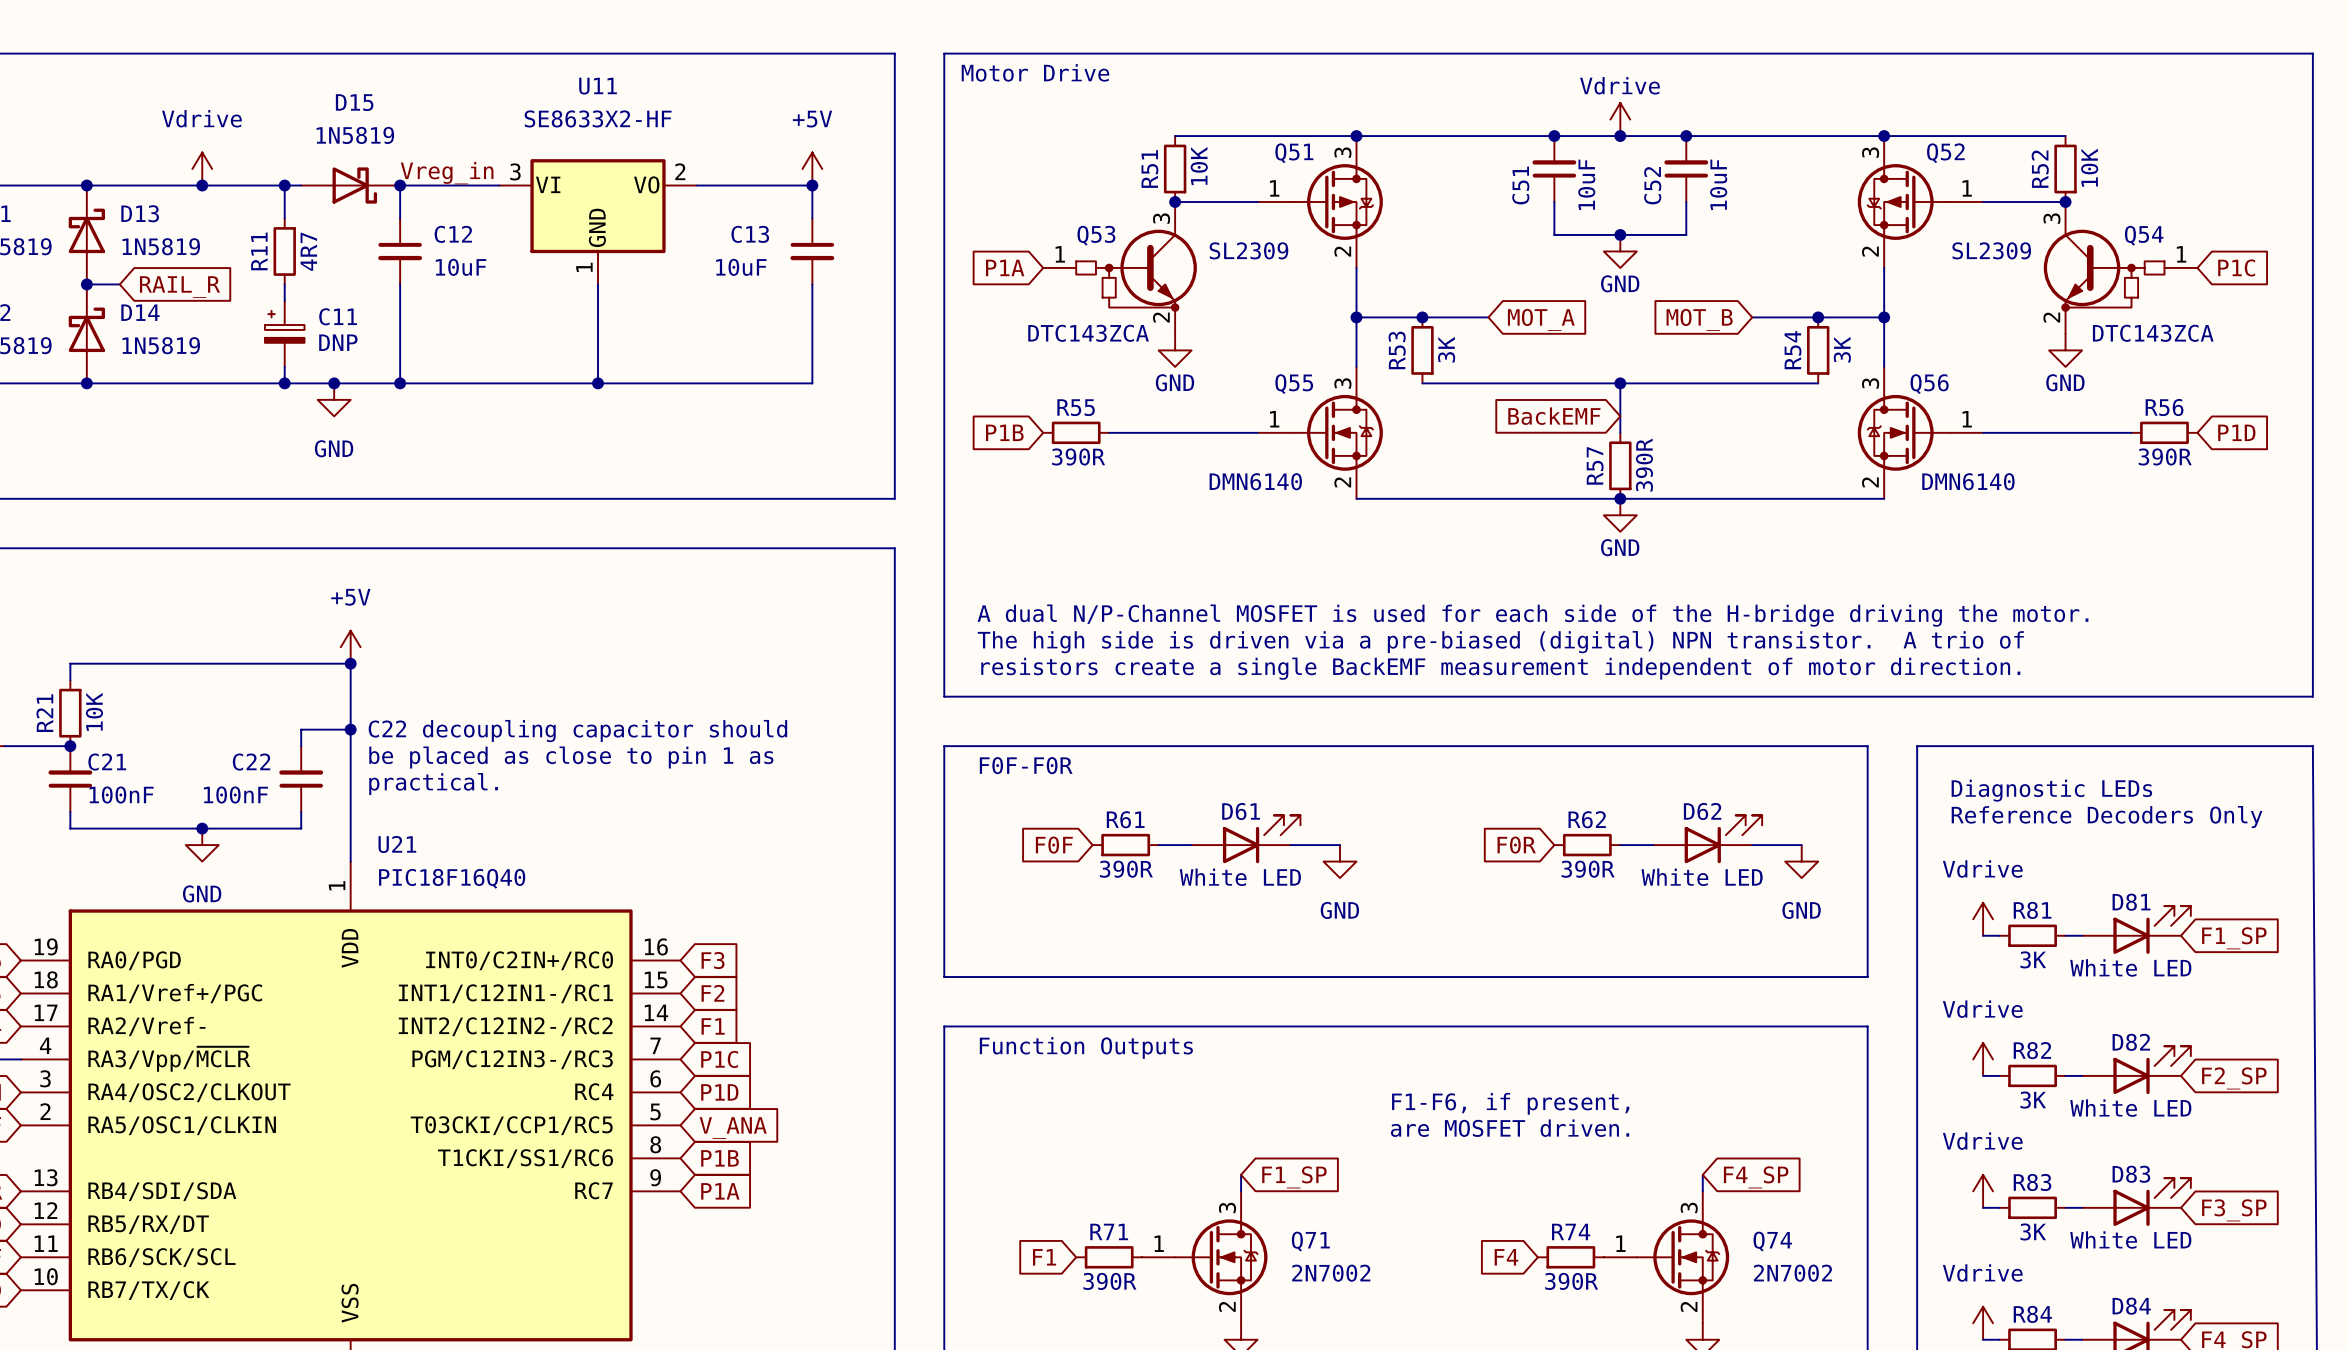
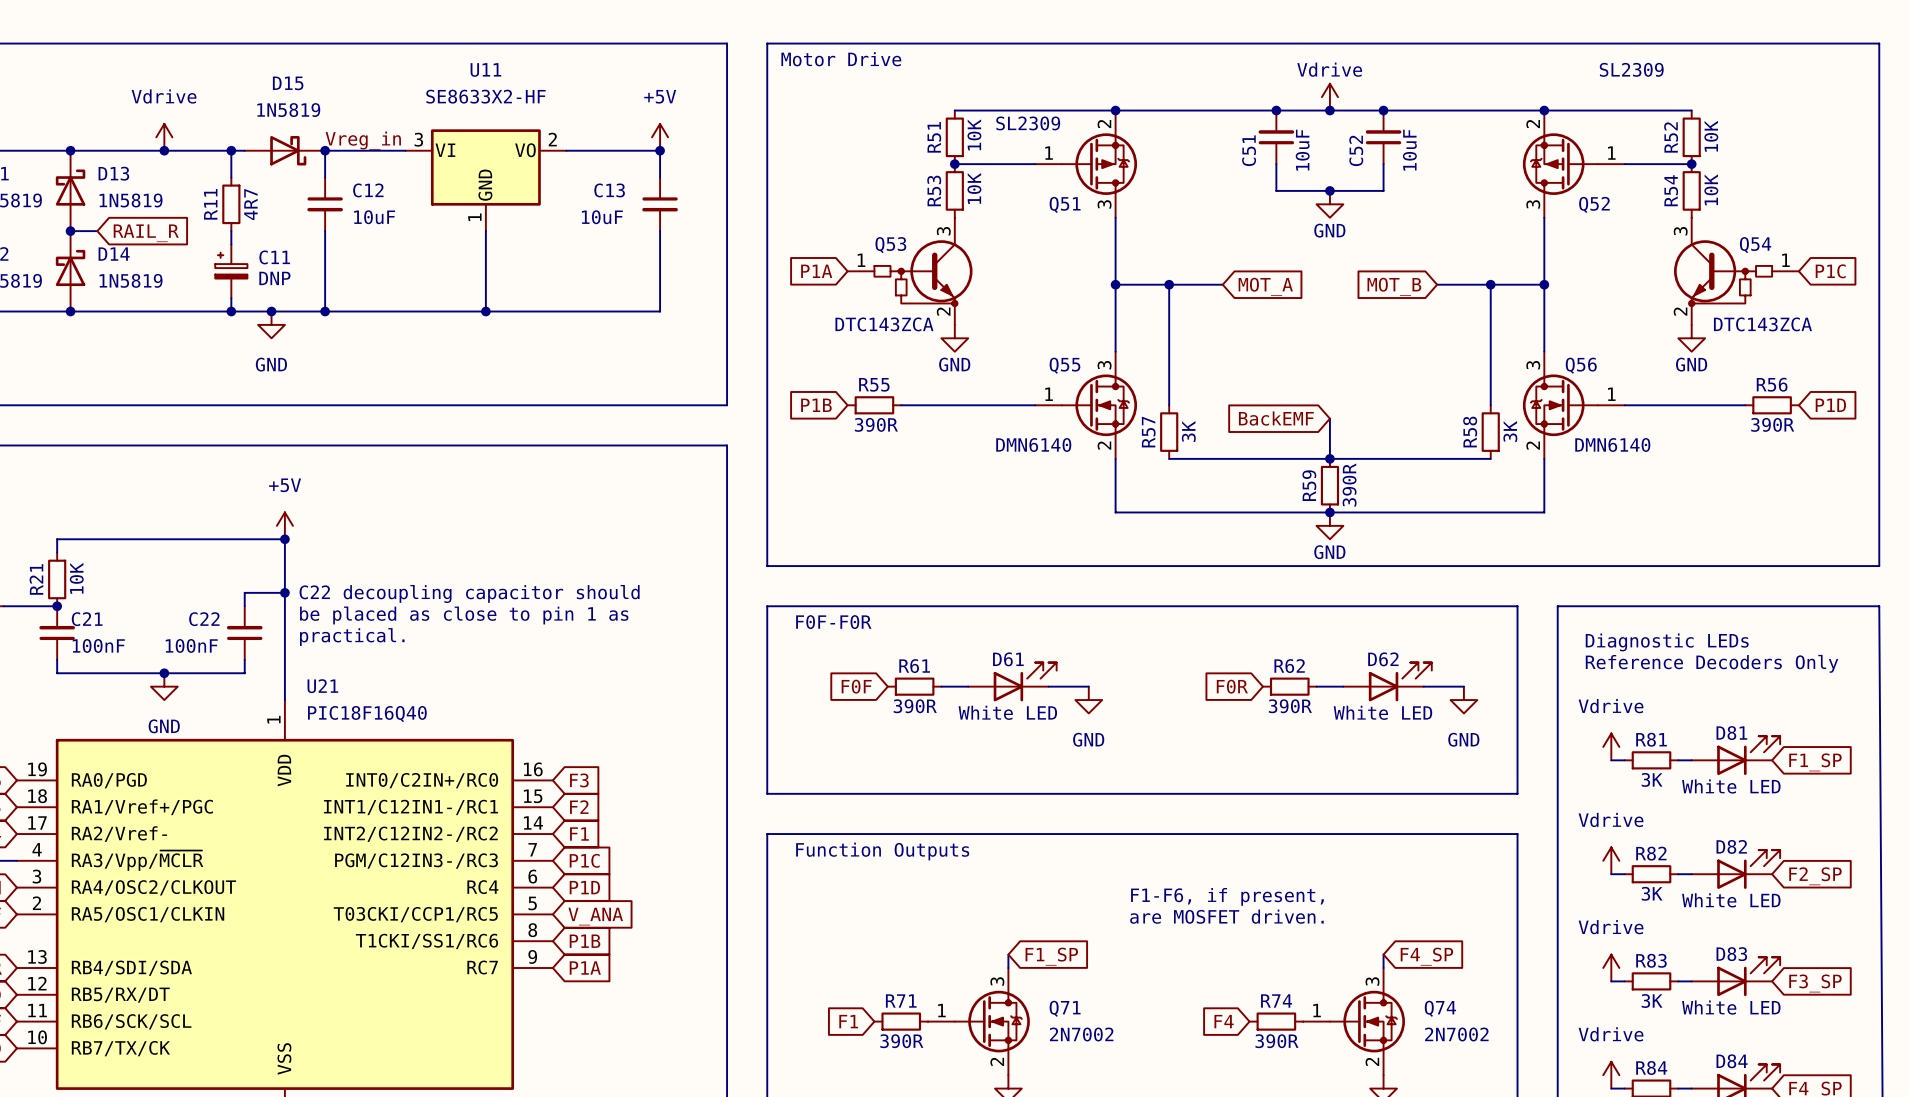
power symbol position: Vdrive (1620, 119) -> Vdrive (1329, 97)
junction position: (1356, 136) -> (1115, 110)
junction position: (1554, 136) -> (1276, 110)
junction position: (1620, 136) -> (1329, 110)
junction position: (1686, 136) -> (1383, 110)
junction position: (1884, 136) -> (1544, 110)
wire: none -> (1678, 110) (1691, 110)
C51 position: (1554, 169) -> (1276, 137)
C52 position: (1686, 169) -> (1383, 137)
R52 position: (2065, 169) -> (1691, 137)
Q51 flip: as is (1336, 202) -> up-down (1099, 164)
wire: (1554, 202) (1554, 234) (1570, 234) -> (1276, 164) (1276, 190)
wire: (1686, 202) (1686, 234) -> (1383, 164) (1383, 190) (1370, 190)
Q52 flip: as is (1903, 202) -> up-down (1560, 164)
junction position: (2065, 202) -> (1691, 164)
junction position: (1620, 234) -> (1329, 190)
Q52 value position: SL2309 (1991, 250) -> SL2309 (1631, 69)
power symbol position: GND (1620, 251) -> GND (1329, 204)
global label position: P1A (1005, 267) -> P1A (816, 271)
Q53 position: (1120, 267) -> (910, 271)
wire: (1356, 267) (1356, 366) -> none
wire: none -> (1115, 217) (1115, 351)
wire: (1884, 267) (1884, 366) -> none
wire: none -> (1544, 217) (1544, 351)
Q54 position: (2120, 267) -> (1736, 271)
global label position: P1C (2236, 267) -> P1C (1830, 271)
wire: (1356, 317) (1488, 317) -> (1115, 284) (1222, 284)
junction: (1356, 317) -> none
junction: (1422, 317) -> none
wire: (1752, 317) (1884, 317) -> (1437, 284) (1544, 284)
junction: (1818, 317) -> none
junction: (1884, 317) -> none
global label position: MOT_A (1541, 319) -> MOT_A (1265, 286)
global label position: MOT_B (1699, 319) -> MOT_B (1394, 286)
R53 value: 3K (1446, 349) -> 10K (974, 188)
R54 value: 3K (1842, 349) -> 10K (1711, 189)
power symbol position: GND (1175, 350) -> GND (954, 338)
junction: none -> (1115, 284)
R53 position: (1422, 350) -> (954, 190)
wire: none -> (1169, 284) (1169, 405)
junction: none -> (1169, 284)
R54 position: (1818, 350) -> (1691, 190)
wire: none -> (1490, 284) (1490, 405)
junction: none -> (1490, 284)
junction: none -> (1544, 284)
power symbol position: GND (2065, 350) -> GND (1691, 338)
wire: (1422, 383) (1818, 383) -> (1169, 458) (1490, 458)
wire: (1620, 383) (1620, 432) -> (1329, 418) (1329, 458)
junction: (1620, 383) -> none
global label position: BackEMF (1554, 416) -> BackEMF (1276, 418)
global label position: P1B (1004, 432) -> P1B (816, 405)
R55 position: (1076, 432) -> (874, 405)
wire: (1109, 432) (1257, 432) -> none
Q55 position: (1320, 432) -> (1086, 405)
Q56 position: (1920, 432) -> (1573, 405)
wire: (1983, 432) (2131, 432) -> (1624, 405) (1745, 405)
R56 position: (2164, 432) -> (1772, 405)
global label position: P1D (2236, 432) -> P1D (1830, 405)
R57 position: (1620, 465) -> (1169, 432)
R57 value: 390R (1644, 465) -> 3K (1188, 431)
wire: none -> (901, 405) (1035, 405)
wire: (1356, 498) (1884, 498) -> none
junction: (1620, 498) -> none
power symbol: GND (1620, 515) -> none
R58: none -> 3K (1490, 432)
wire: none -> (1115, 458) (1115, 512) (1544, 512) (1544, 458)
junction: none -> (1329, 458)
R59: none -> 390R (1329, 485)
text: A dual N/P-Channel MOSFET is used for each side of the H-bridge driving the motor. (1533, 615) -> none
junction: none -> (1329, 512)
text: The high side is driven via a pre-biased (digital) NPN transistor. A trio of (1500, 642) -> none
power symbol: none -> GND (1329, 525)
text: resistors create a single BackEMF measurement independent of motor direction. (1500, 668) -> none

